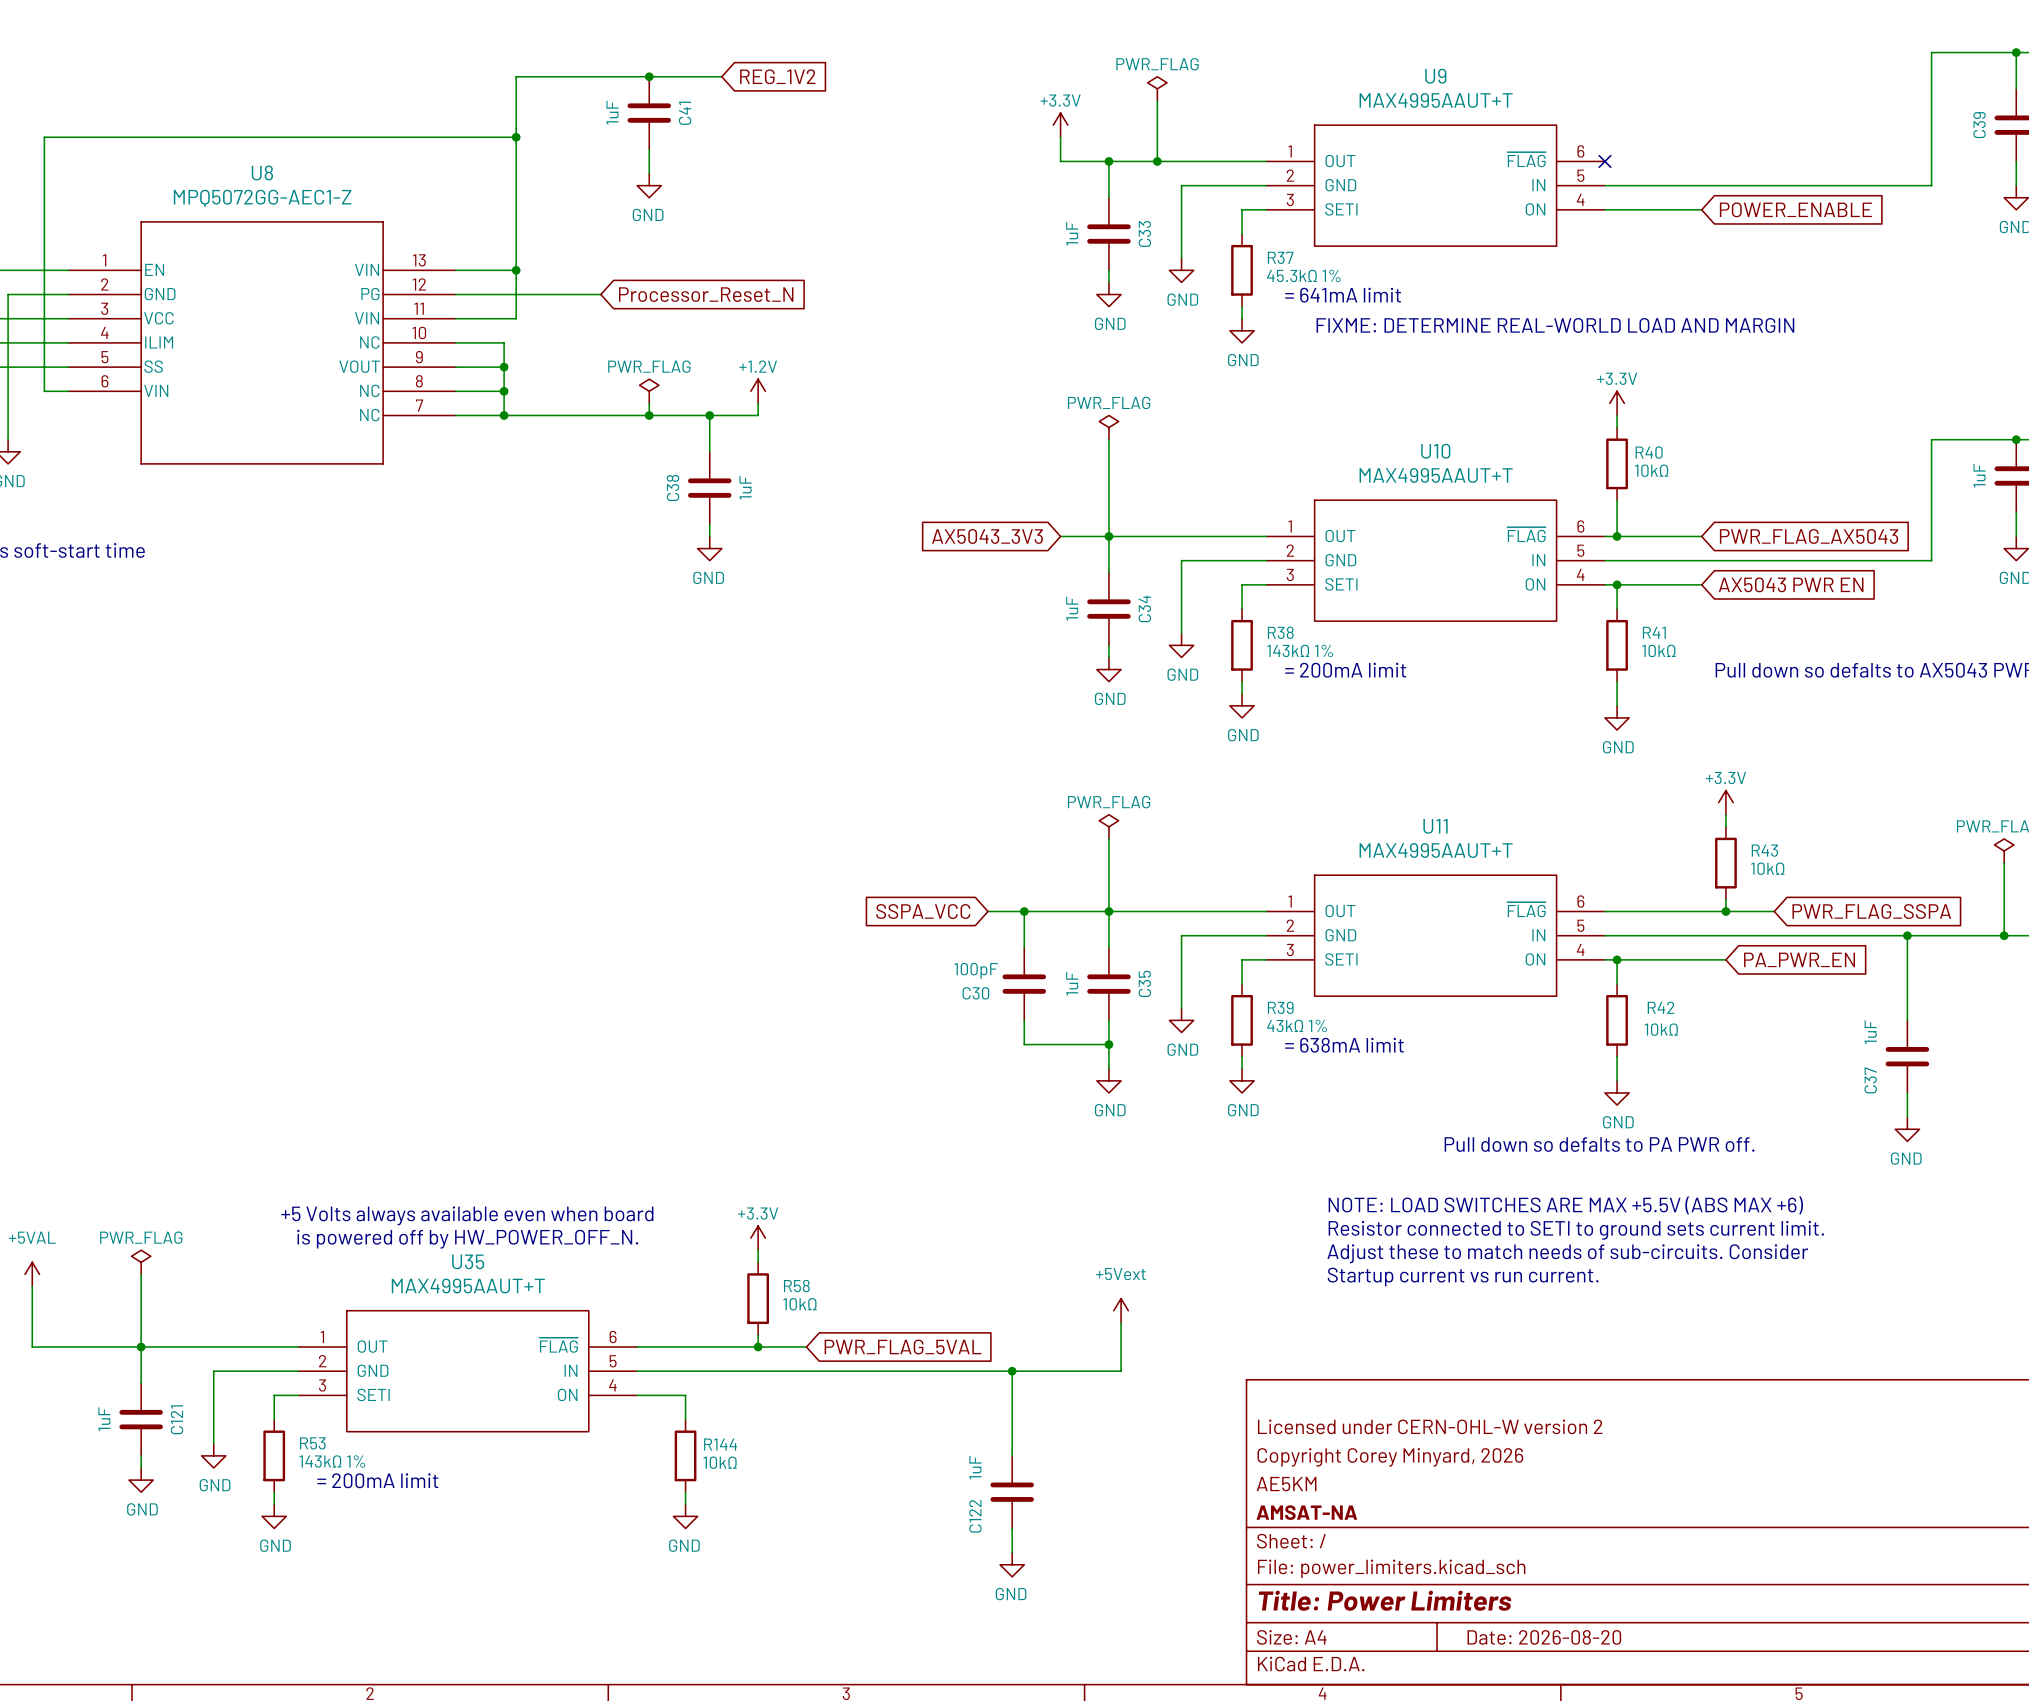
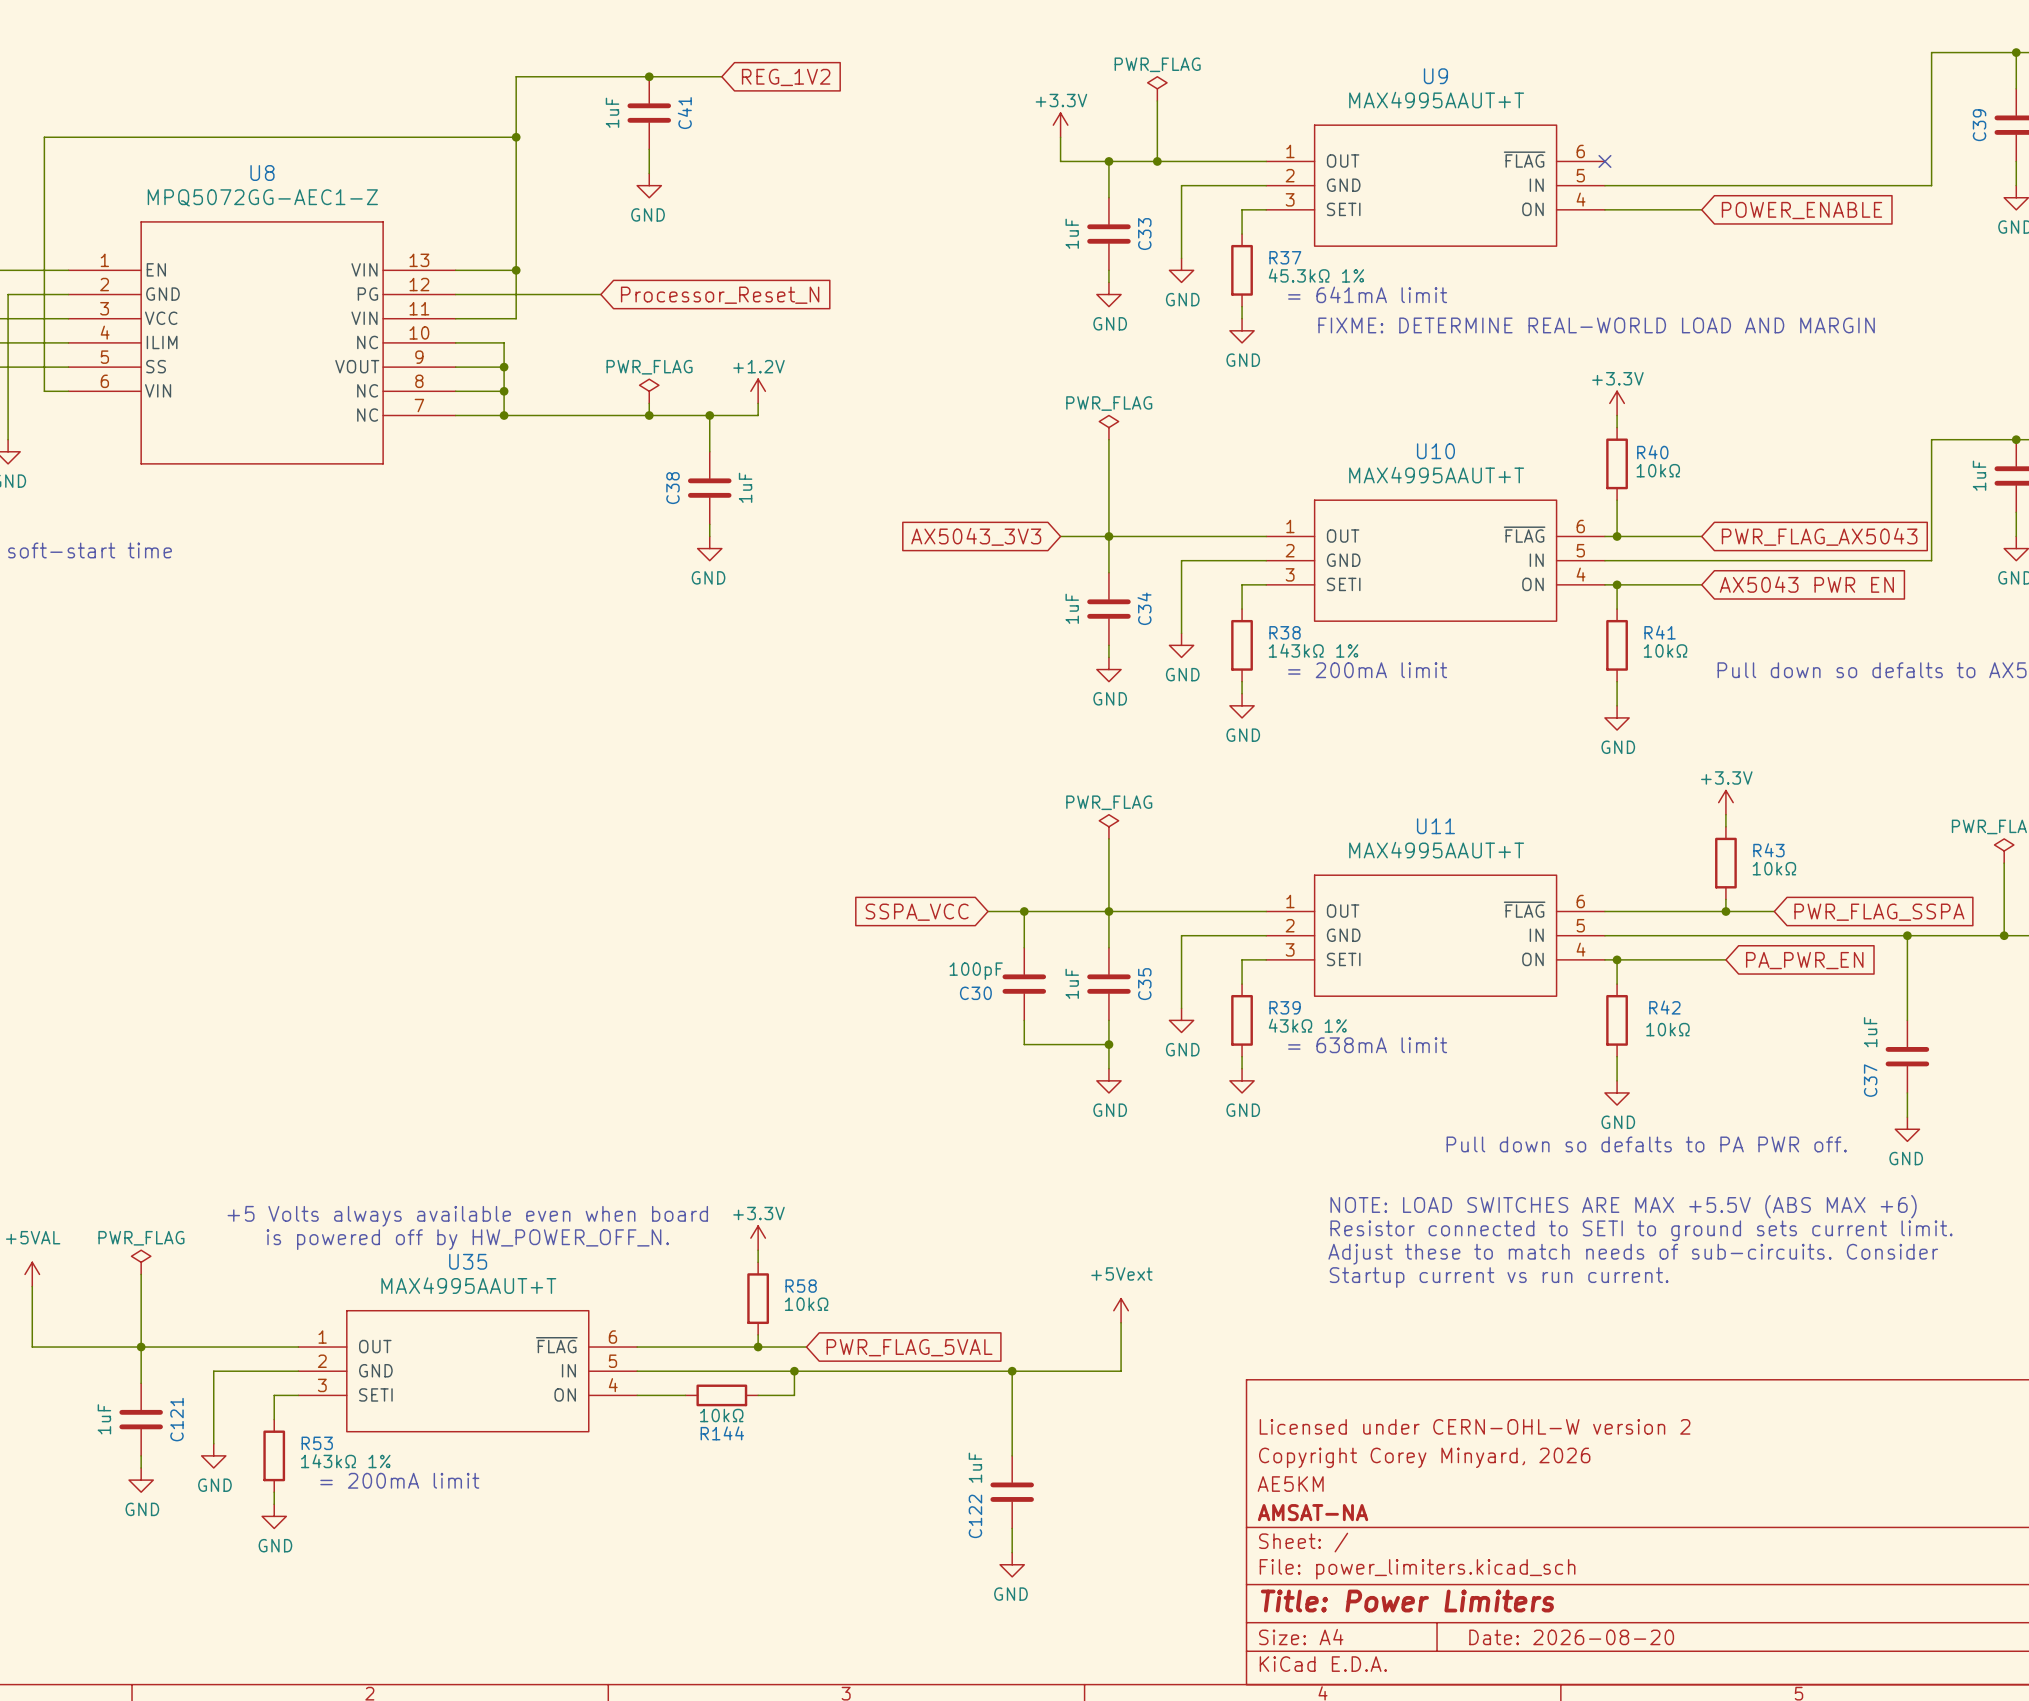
wire: none -> (794, 1371) (794, 1395) (758, 1395)
junction: none -> (794, 1371)
wire: (685, 1395) (685, 1419) -> none
R144 rotation: 0° (685, 1455) -> 90° clockwise (721, 1395)
R144 position: (685, 1455) -> (721, 1395)
R144 value position: 10kΩ (720, 1462) -> 10kΩ (721, 1415)
wire: (685, 1492) (685, 1504) -> none
power symbol: GND (685, 1516) -> none

